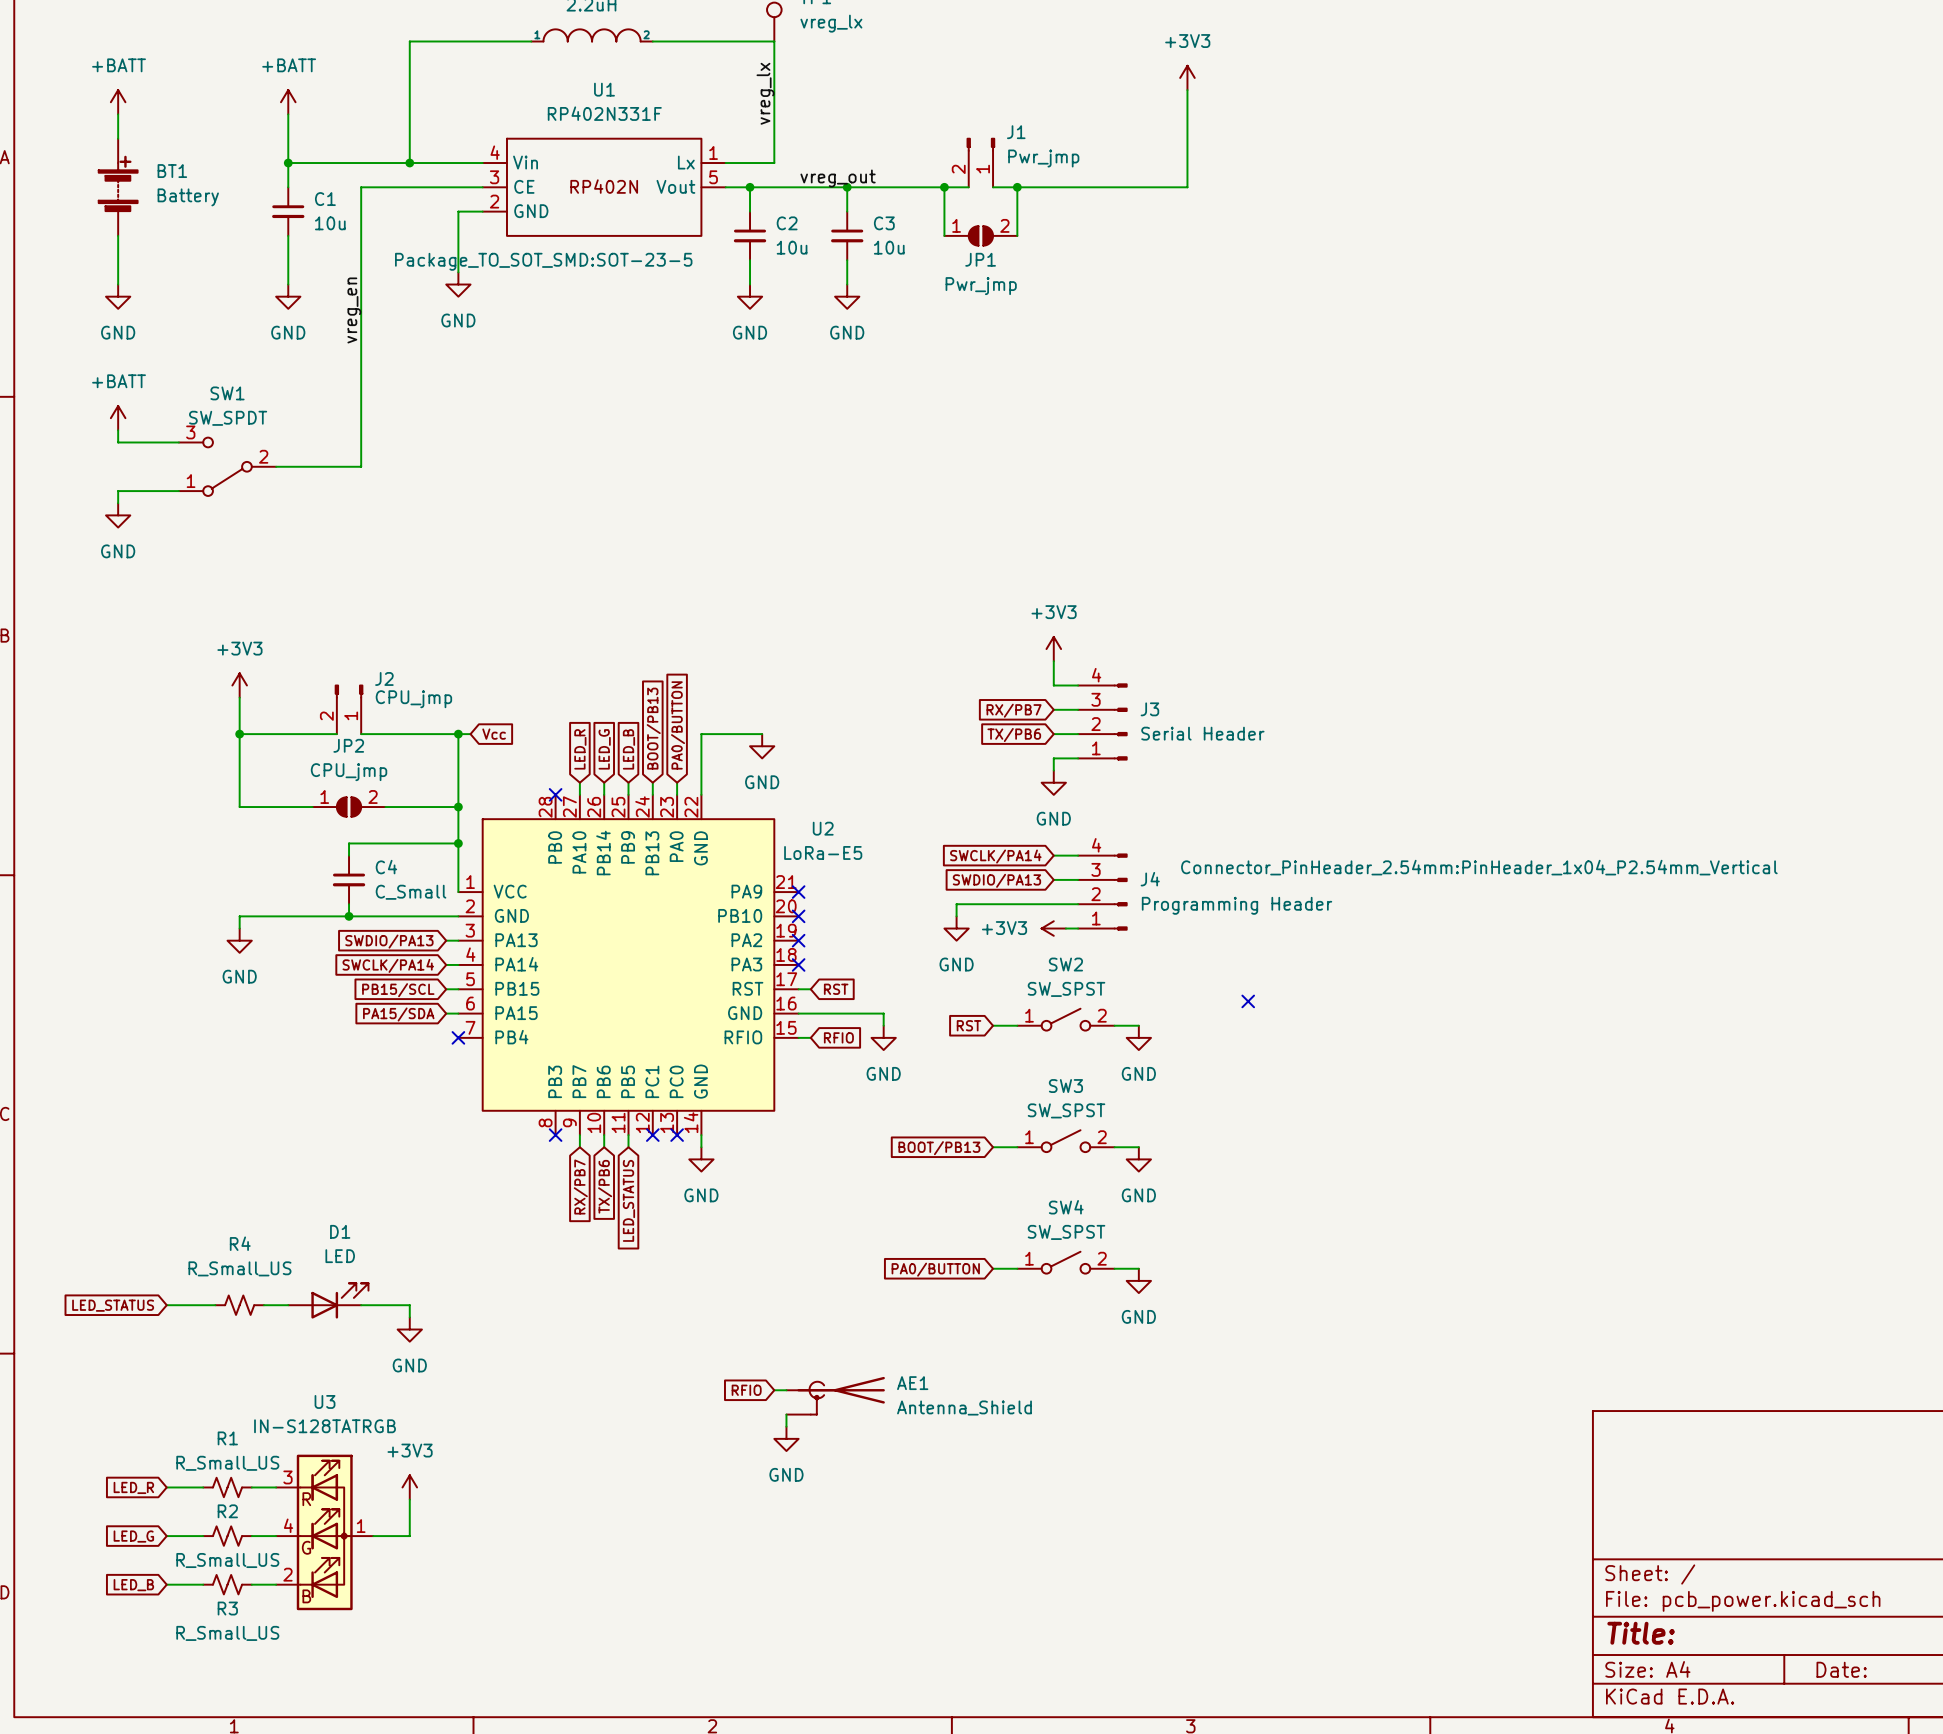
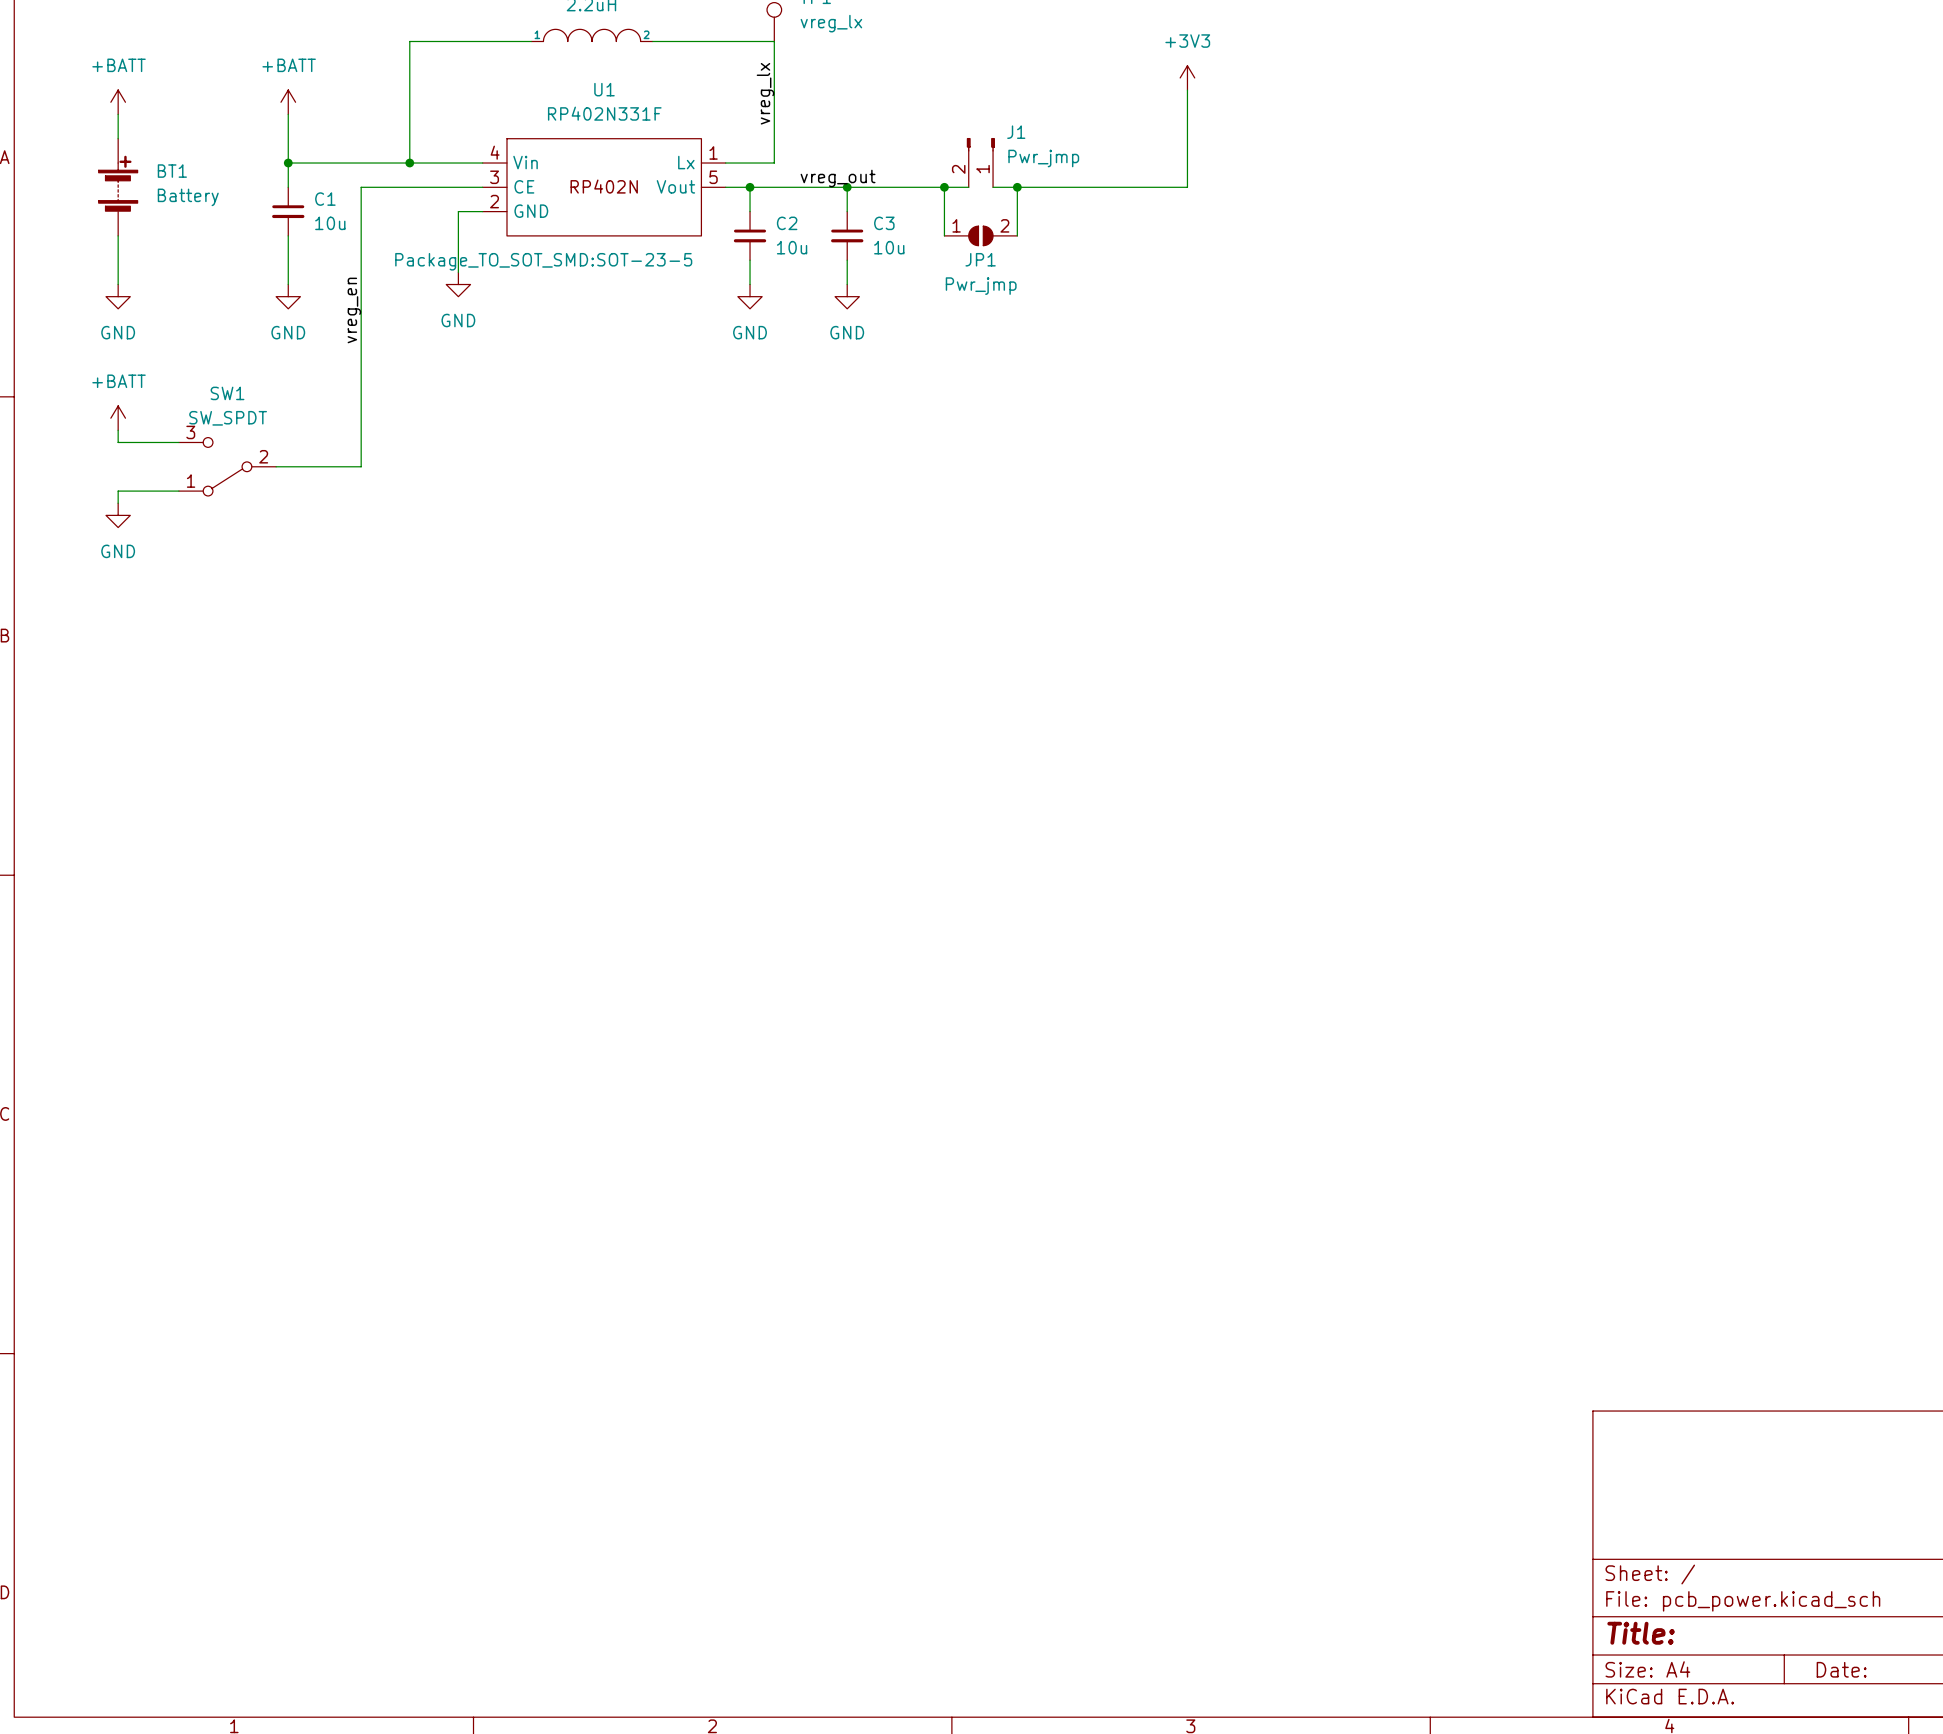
power symbol: +3V3 (1053, 649) -> none
wire: (1053, 661) (1053, 685) (1078, 685) -> none
power symbol: +3V3 (239, 685) -> none
wire: (239, 697) (239, 807) (312, 807) -> none
J2: CPU_jmp (349, 709) -> none
wire: (1053, 709) (1078, 709) -> none
global label: RX/PB7 (1014, 710) -> none
J3: Serial Header (1102, 721) -> none
global label: PA0/BUTTON (678, 725) -> none
global label: BOOT/PB13 (653, 728) -> none
wire: (239, 734) (336, 734) -> none
junction: (239, 734) -> none
wire: (361, 734) (470, 734) -> none
wire: (458, 734) (458, 892) -> none
junction: (458, 734) -> none
global label: Vcc (494, 734) -> none
wire: (762, 734) (701, 734) (701, 794) -> none
wire: (1053, 734) (1078, 734) -> none
global label: TX/PB6 (1014, 735) -> none
power symbol: GND (762, 746) -> none
global label: LED_R (580, 749) -> none
global label: LED_G (604, 749) -> none
global label: LED_B (628, 749) -> none
wire: (1078, 758) (1053, 758) (1053, 770) -> none
wire: (579, 782) (579, 794) -> none
wire: (604, 782) (604, 794) -> none
wire: (628, 782) (628, 794) -> none
wire: (652, 782) (652, 794) -> none
wire: (677, 782) (677, 794) -> none
power symbol: GND (1053, 782) -> none
no-connect mark: (555, 794) -> none
JP2: CPU_jmp (349, 807) -> none
wire: (385, 807) (458, 807) -> none
junction: (458, 807) -> none
wire: (458, 843) (349, 843) (349, 855) -> none
junction: (458, 843) -> none
wire: (1053, 855) (1078, 855) -> none
global label: SWCLK/PA14 (995, 856) -> none
C4: C_Small (349, 879) -> none
wire: (1053, 879) (1078, 879) -> none
global label: SWDIO/PA13 (996, 880) -> none
no-connect mark: (798, 892) -> none
J4: Programming Header (1102, 892) -> none
wire: (349, 904) (349, 916) -> none
wire: (1078, 904) (956, 904) (956, 916) -> none
junction: (349, 916) -> none
wire: (458, 916) (239, 916) (239, 928) -> none
no-connect mark: (798, 916) -> none
power symbol: GND (956, 928) -> none
power symbol: +3V3 (1053, 928) -> none
wire: (1065, 928) (1078, 928) -> none
power symbol: GND (239, 940) -> none
wire: (446, 940) (458, 940) -> none
no-connect mark: (798, 940) -> none
global label: SWDIO/PA13 (389, 941) -> none
wire: (446, 964) (458, 964) -> none
U2: LoRa-E5 (628, 964) -> none
no-connect mark: (798, 964) -> none
global label: SWCLK/PA14 (388, 965) -> none
wire: (446, 989) (458, 989) -> none
wire: (798, 989) (810, 989) -> none
global label: RST (836, 989) -> none
global label: PB15/SCL (398, 990) -> none
no-connect mark: (1248, 1001) -> none
wire: (446, 1013) (458, 1013) -> none
wire: (798, 1013) (883, 1013) (883, 1025) -> none
global label: PA15/SDA (398, 1014) -> none
SW2: SW_SPST (1065, 1019) -> none
global label: RST (969, 1025) -> none
wire: (993, 1025) (1017, 1025) -> none
wire: (1114, 1025) (1138, 1025) -> none
no-connect mark: (458, 1037) -> none
wire: (798, 1037) (810, 1037) -> none
global label: RFIO (838, 1037) -> none
power symbol: GND (883, 1037) -> none
power symbol: GND (1138, 1037) -> none
no-connect mark: (555, 1135) -> none
wire: (579, 1135) (579, 1147) -> none
wire: (604, 1135) (604, 1147) -> none
wire: (628, 1135) (628, 1147) -> none
no-connect mark: (652, 1135) -> none
no-connect mark: (677, 1135) -> none
wire: (701, 1135) (701, 1147) -> none
SW3: SW_SPST (1065, 1141) -> none
wire: (993, 1147) (1017, 1147) -> none
wire: (1114, 1147) (1138, 1147) -> none
global label: BOOT/PB13 (939, 1148) -> none
power symbol: GND (701, 1159) -> none
power symbol: GND (1138, 1159) -> none
global label: RX/PB7 (580, 1186) -> none
global label: TX/PB6 (605, 1186) -> none
global label: LED_STATUS (628, 1200) -> none
SW4: SW_SPST (1065, 1262) -> none
wire: (993, 1268) (1017, 1268) -> none
wire: (1114, 1268) (1138, 1268) -> none
global label: PA0/BUTTON (935, 1269) -> none
power symbol: GND (1138, 1280) -> none
D1: LED (328, 1300) -> none
global label: LED_STATUS (113, 1305) -> none
wire: (166, 1305) (215, 1305) -> none
R4: R_Small_US (239, 1305) -> none
wire: (263, 1305) (288, 1305) -> none
wire: (361, 1305) (409, 1305) (409, 1317) -> none
power symbol: GND (409, 1329) -> none
global label: RFIO (746, 1390) -> none
wire: (774, 1390) (786, 1390) -> none
AE1: Antenna_Shield (835, 1395) -> none
wire: (786, 1414) (786, 1426) -> none
power symbol: GND (786, 1438) -> none
global label: LED_R (133, 1487) -> none
wire: (166, 1487) (203, 1487) -> none
R1: R_Small_US (227, 1487) -> none
wire: (251, 1487) (276, 1487) -> none
power symbol: +3V3 (409, 1487) -> none
wire: (409, 1499) (409, 1536) (373, 1536) -> none
U3: IN-S128TATRGB (324, 1532) -> none
global label: LED_G (133, 1536) -> none
wire: (166, 1536) (203, 1536) -> none
R2: R_Small_US (227, 1536) -> none
wire: (251, 1536) (276, 1536) -> none
wire: (166, 1584) (203, 1584) -> none
R3: R_Small_US (227, 1584) -> none
wire: (251, 1584) (276, 1584) -> none
global label: LED_B (133, 1585) -> none

